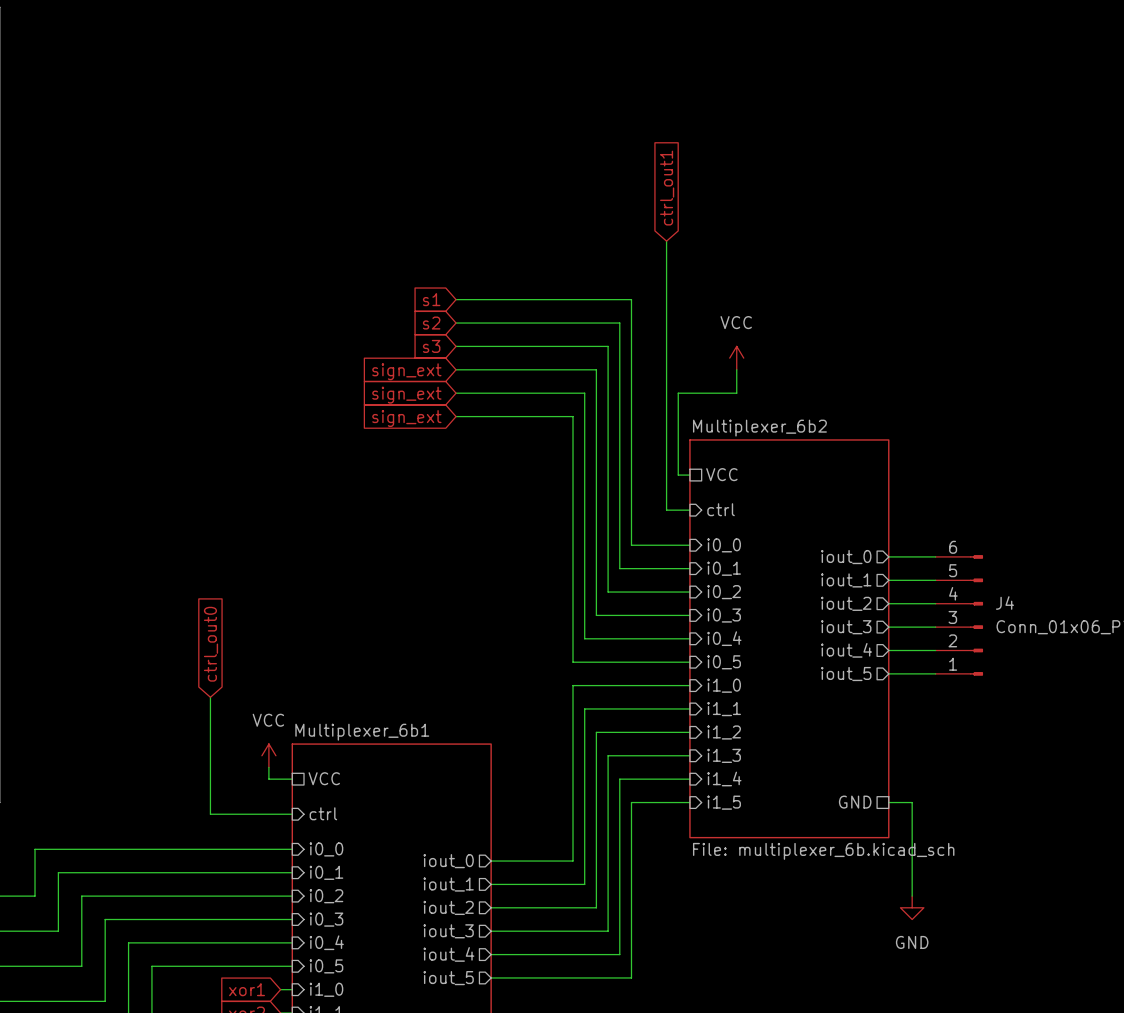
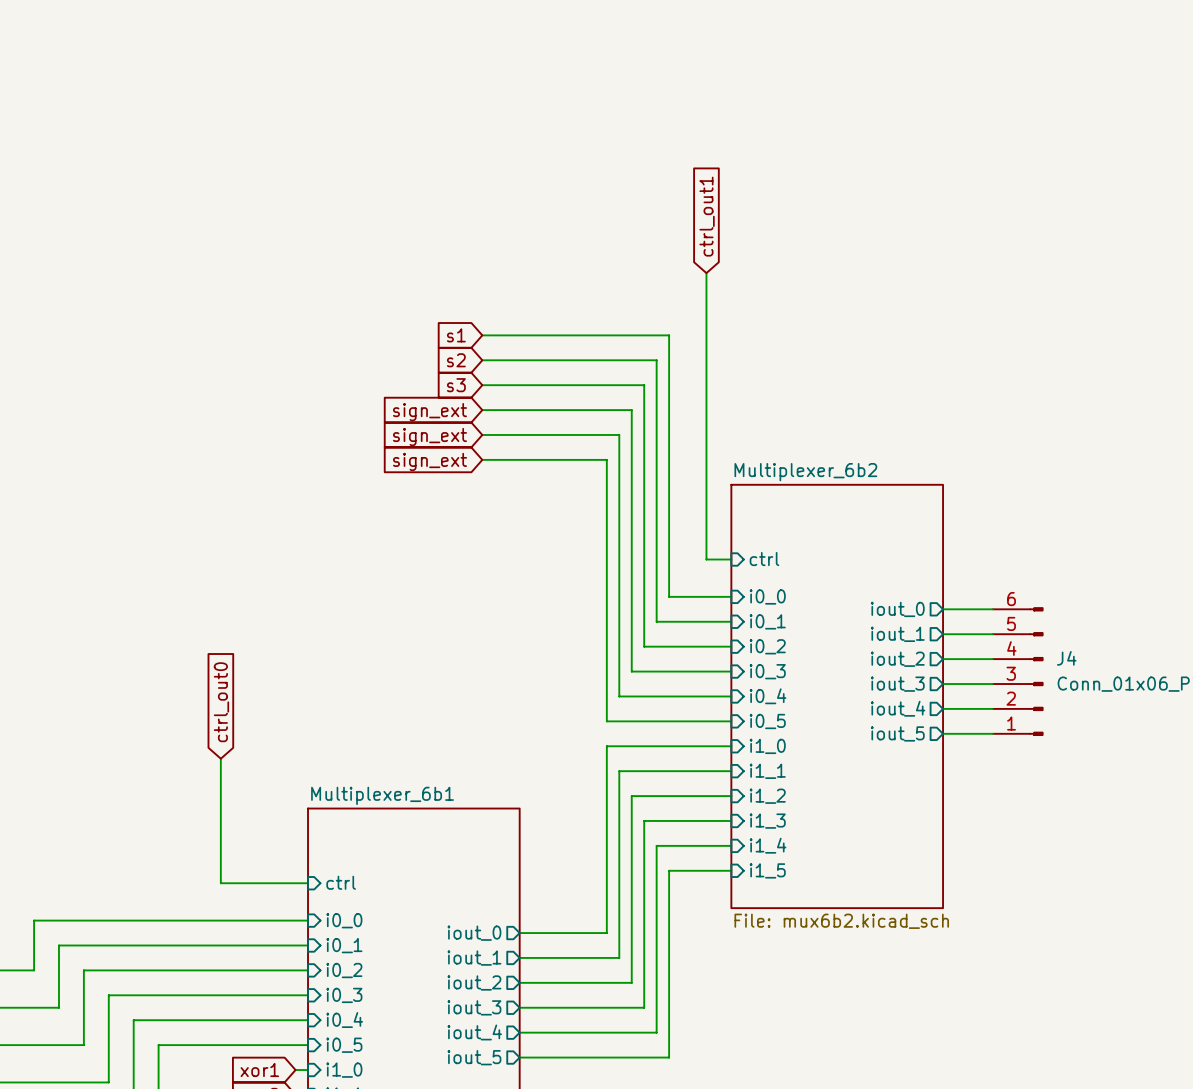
power symbol: VCC (736, 358) -> none
wire: (736, 369) (736, 393) (678, 393) (678, 475) (689, 475) -> none
sheet pin: VCC (721, 474) -> none
power symbol: VCC (268, 755) -> none
wire: (268, 767) (268, 779) (292, 779) -> none
sheet pin: VCC (324, 778) -> none
sheet pin: GND (855, 802) -> none
wire: (888, 802) (912, 802) (912, 896) -> none
sheet Multiplexer_6b2 value: File: multiplexer_6b.kicad_sch (823, 851) -> File: mux6b2.kicad_sch (841, 921)
power symbol: GND (912, 907) -> none

